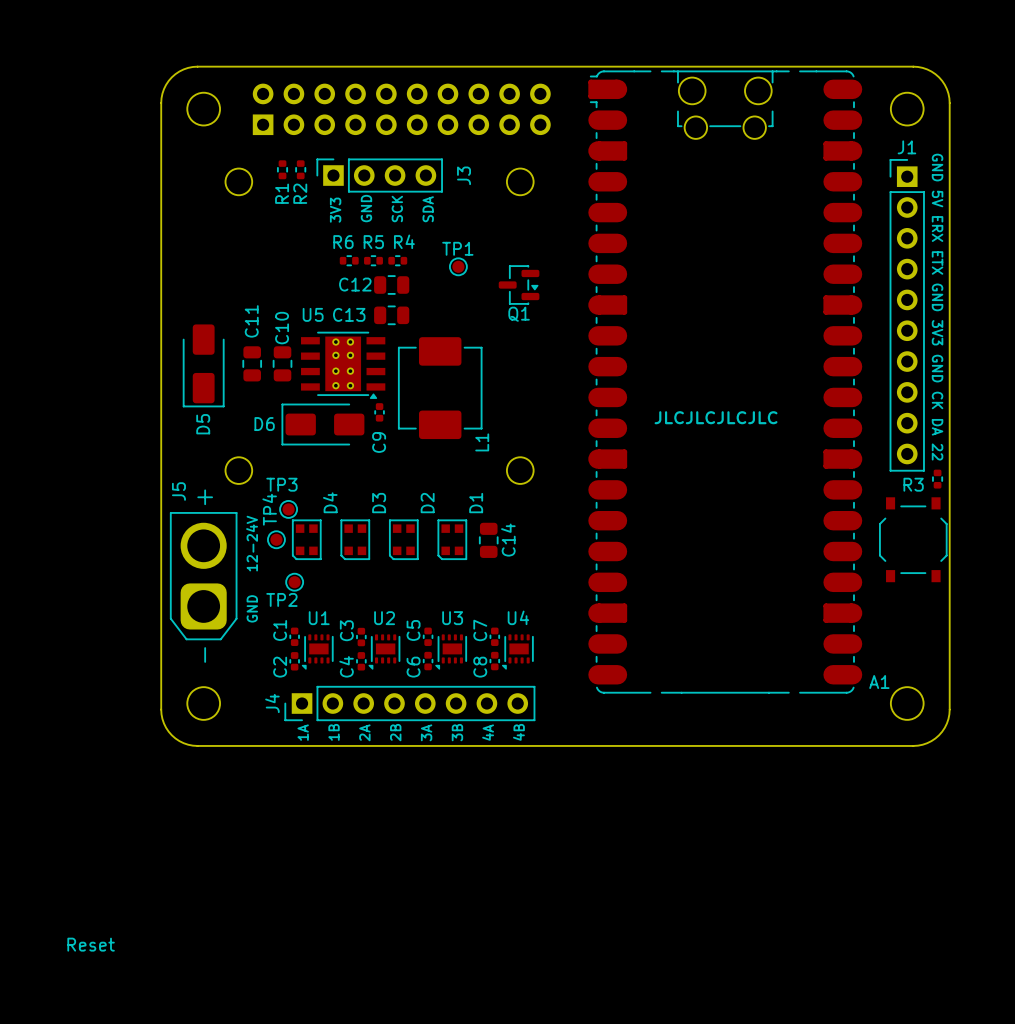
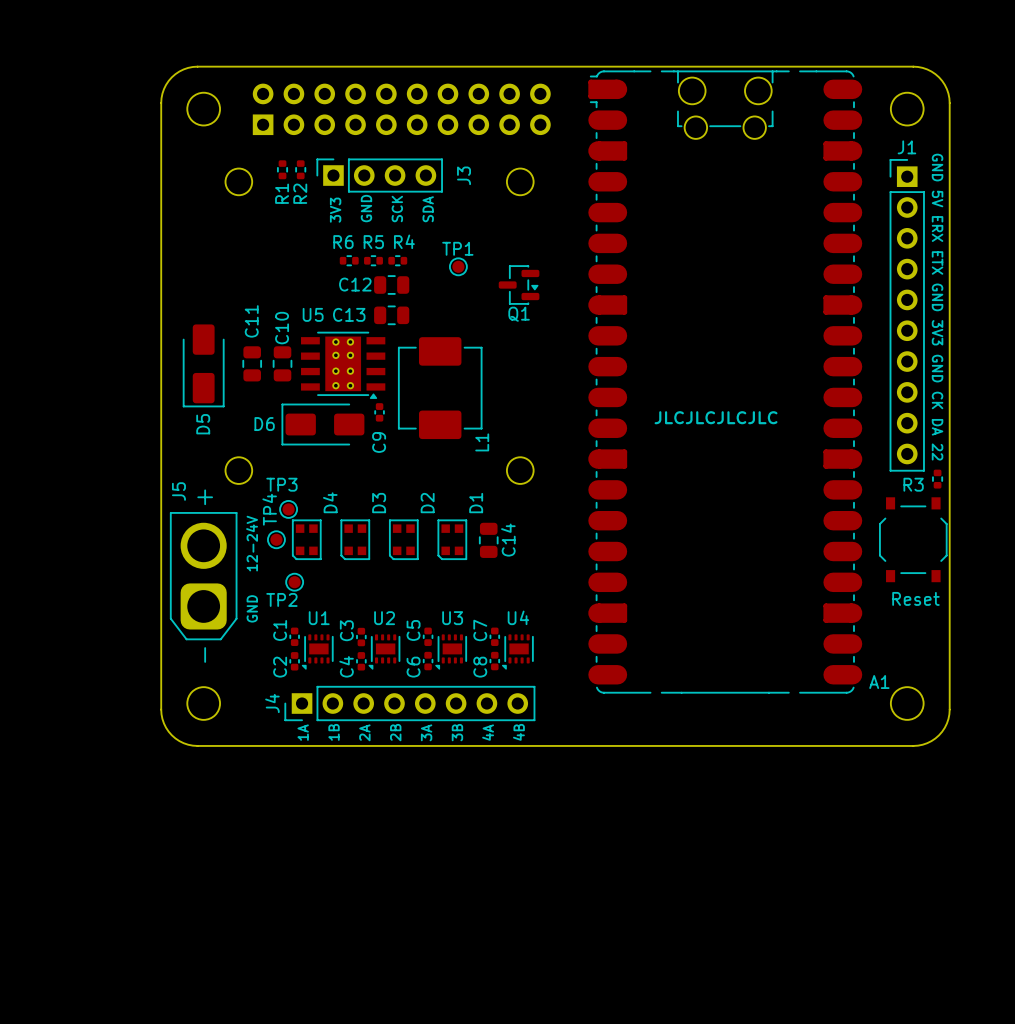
text: none -> Reset (915, 598)
text: Reset (91, 944) -> none

